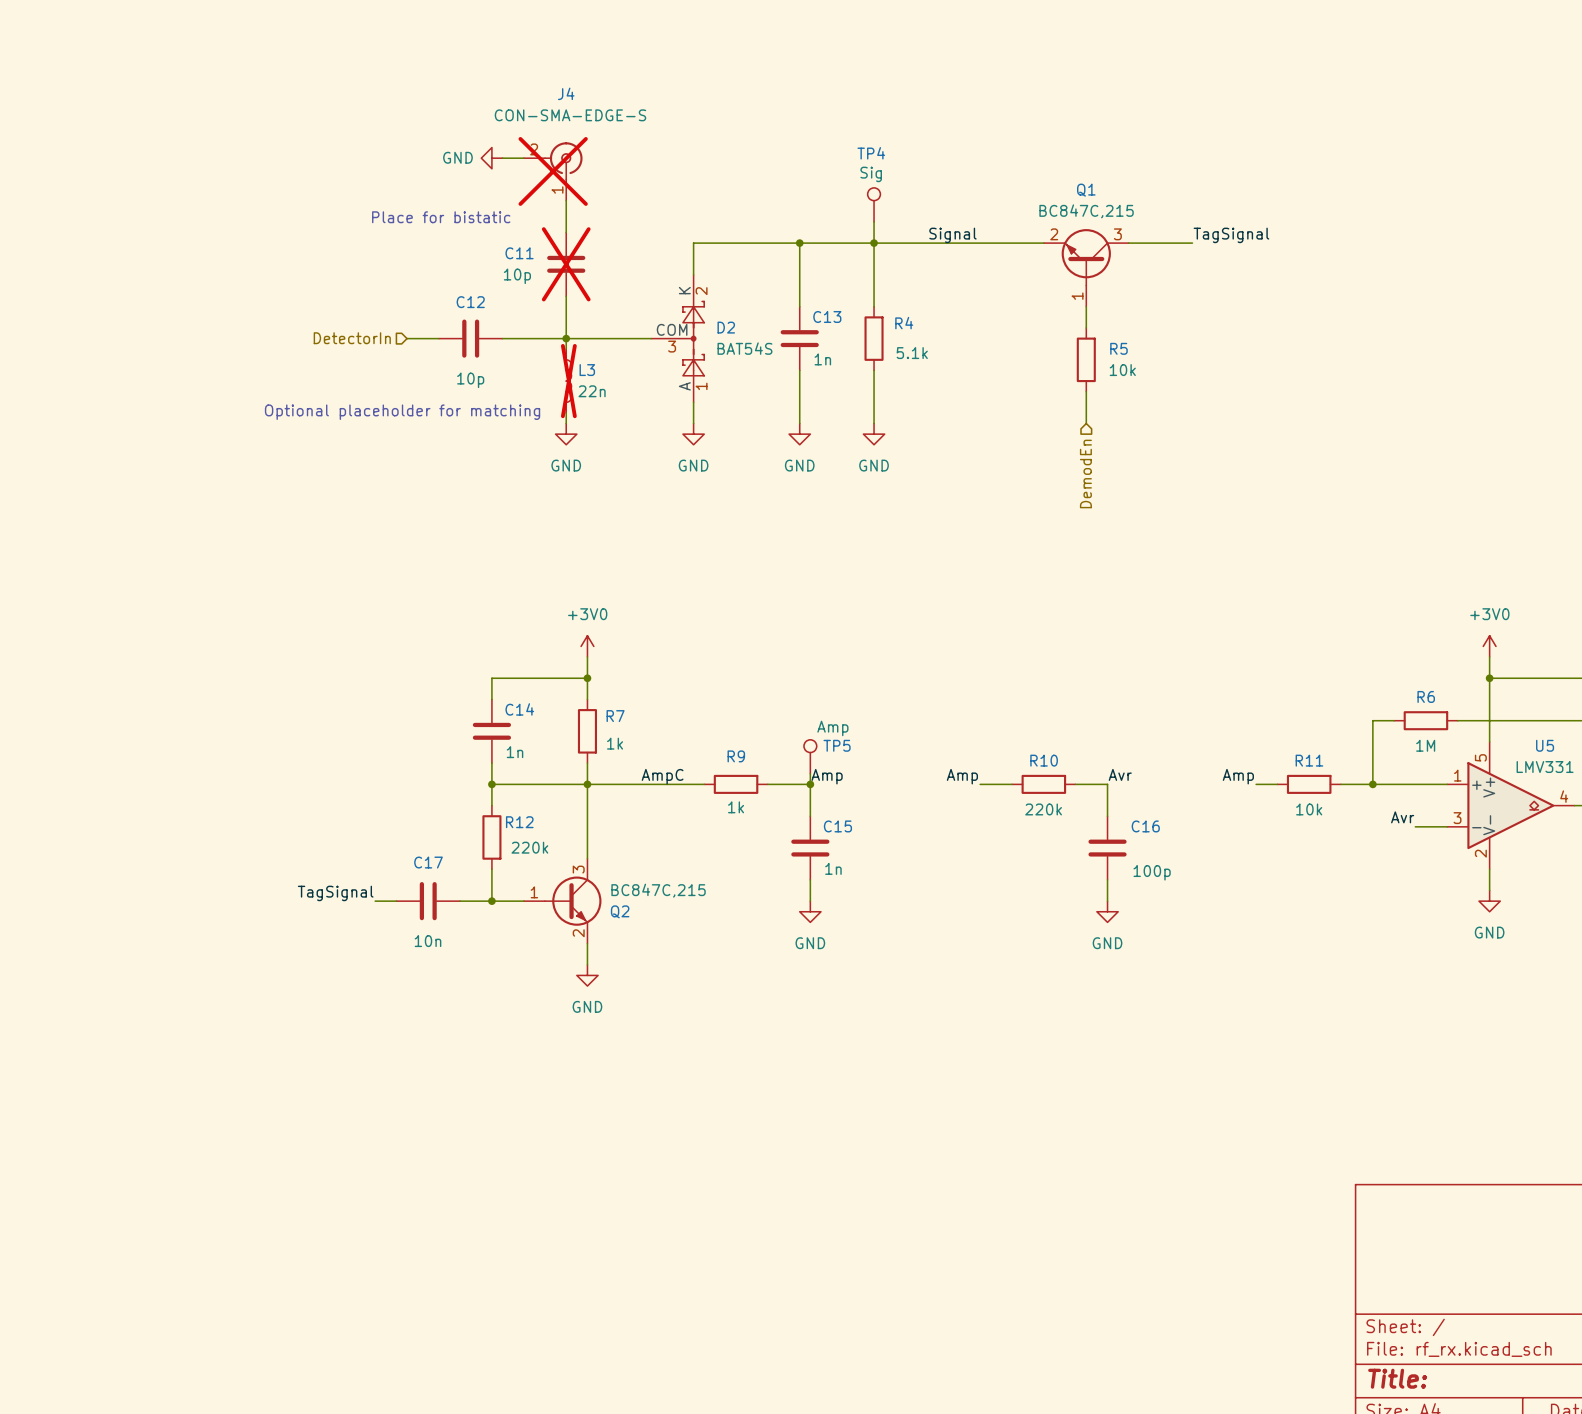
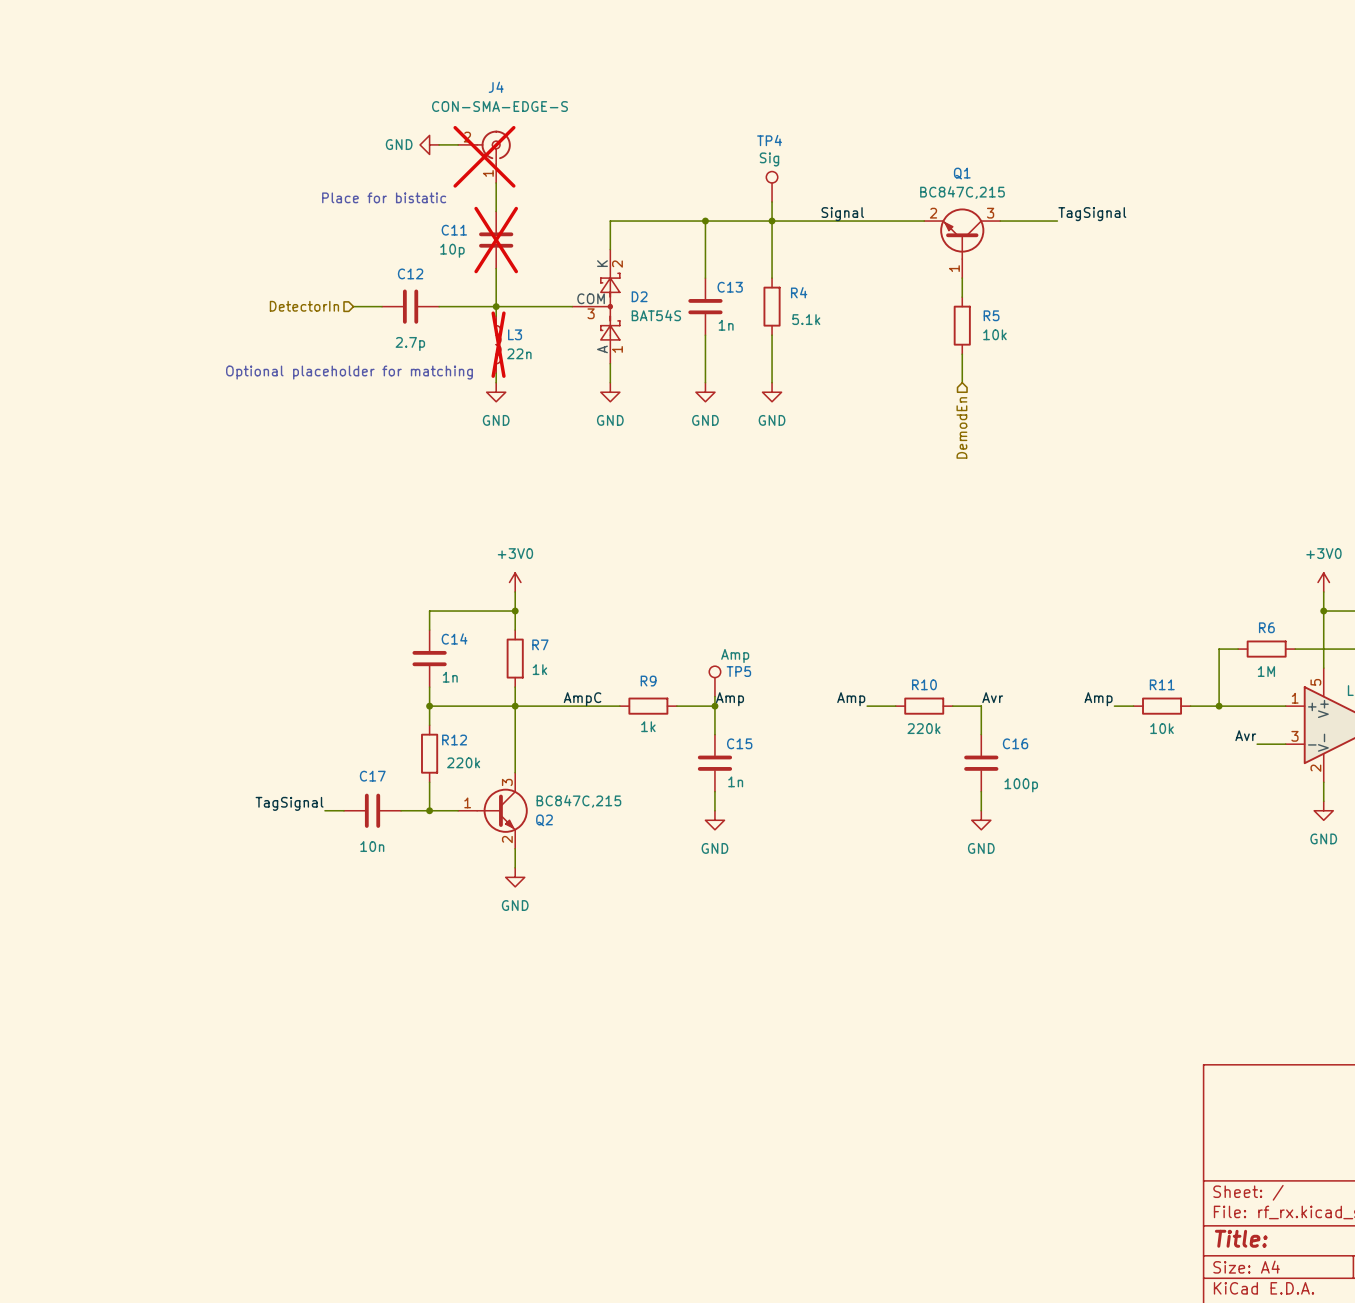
C12 value: 10p (470, 380) -> 2.7p (410, 344)

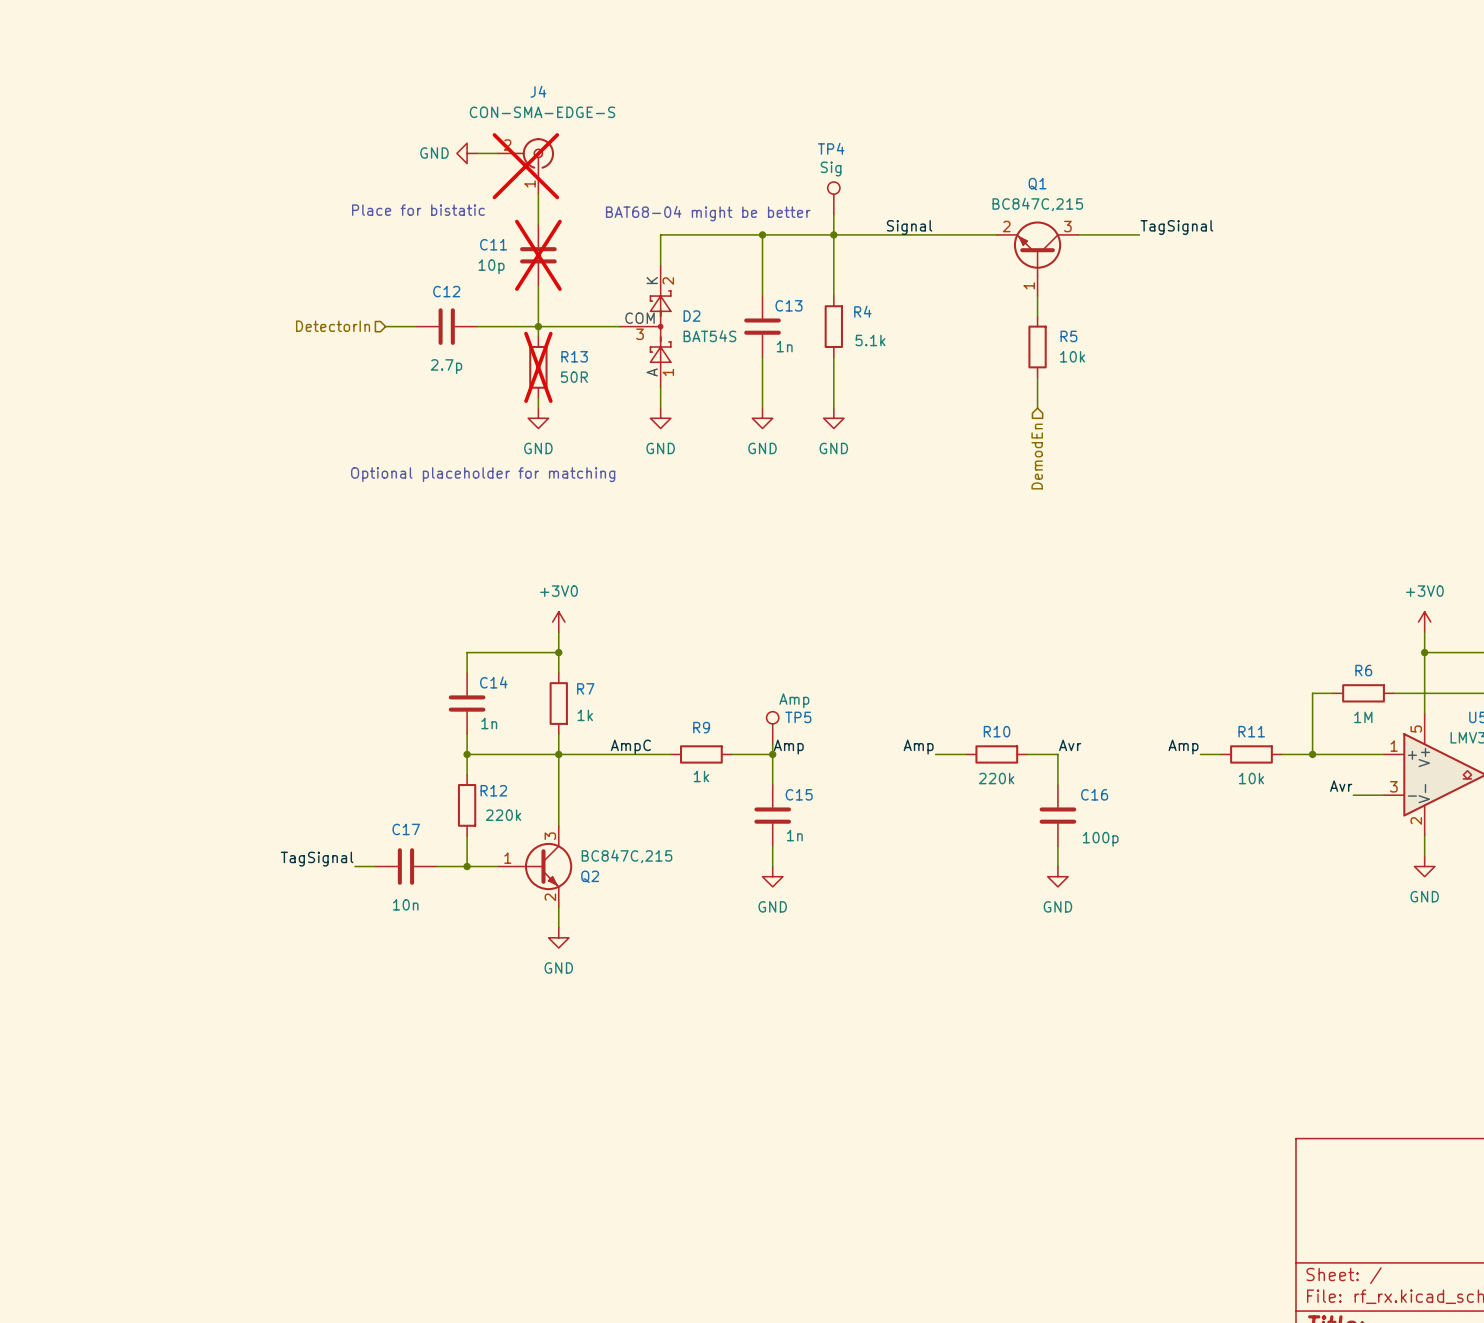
text: none -> BAT68-04 might be better (708, 213)
R13: none -> 50R (538, 367)
L3: 22n (498, 344) -> none
text position: Optional placeholder for matching (349, 372) -> Optional placeholder for matching (483, 474)

